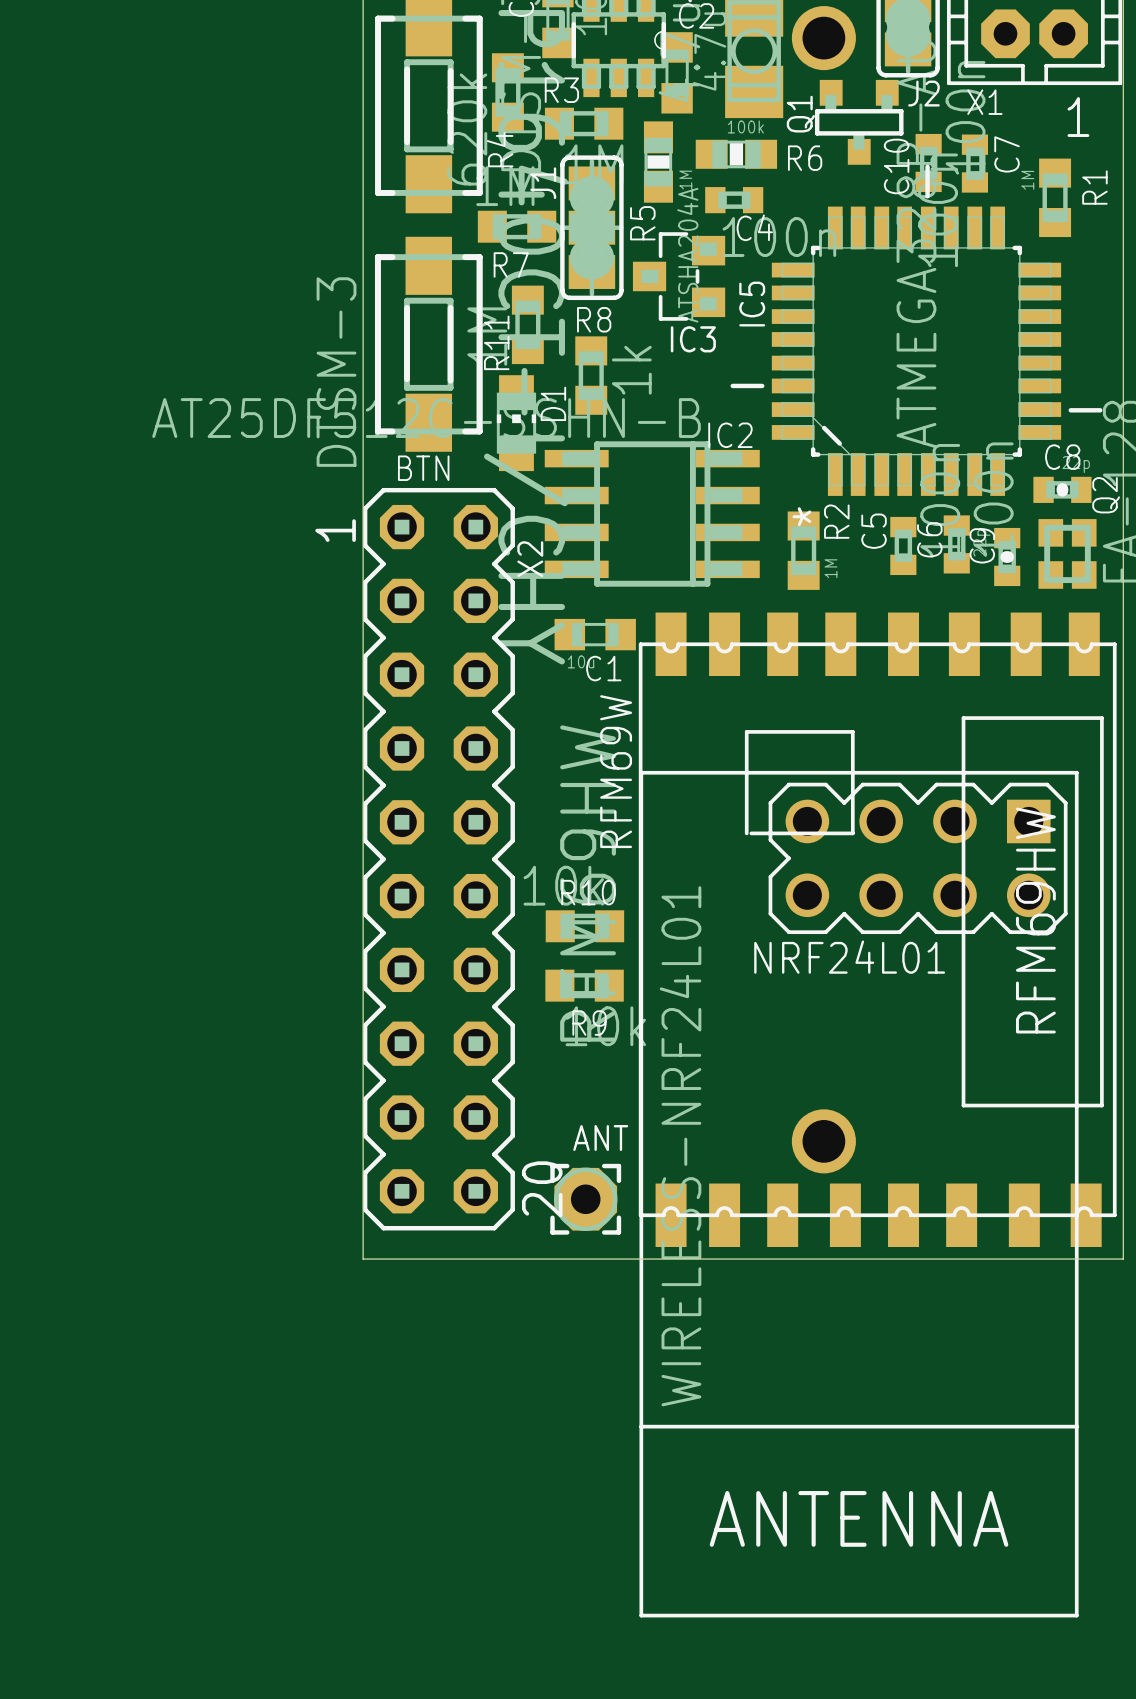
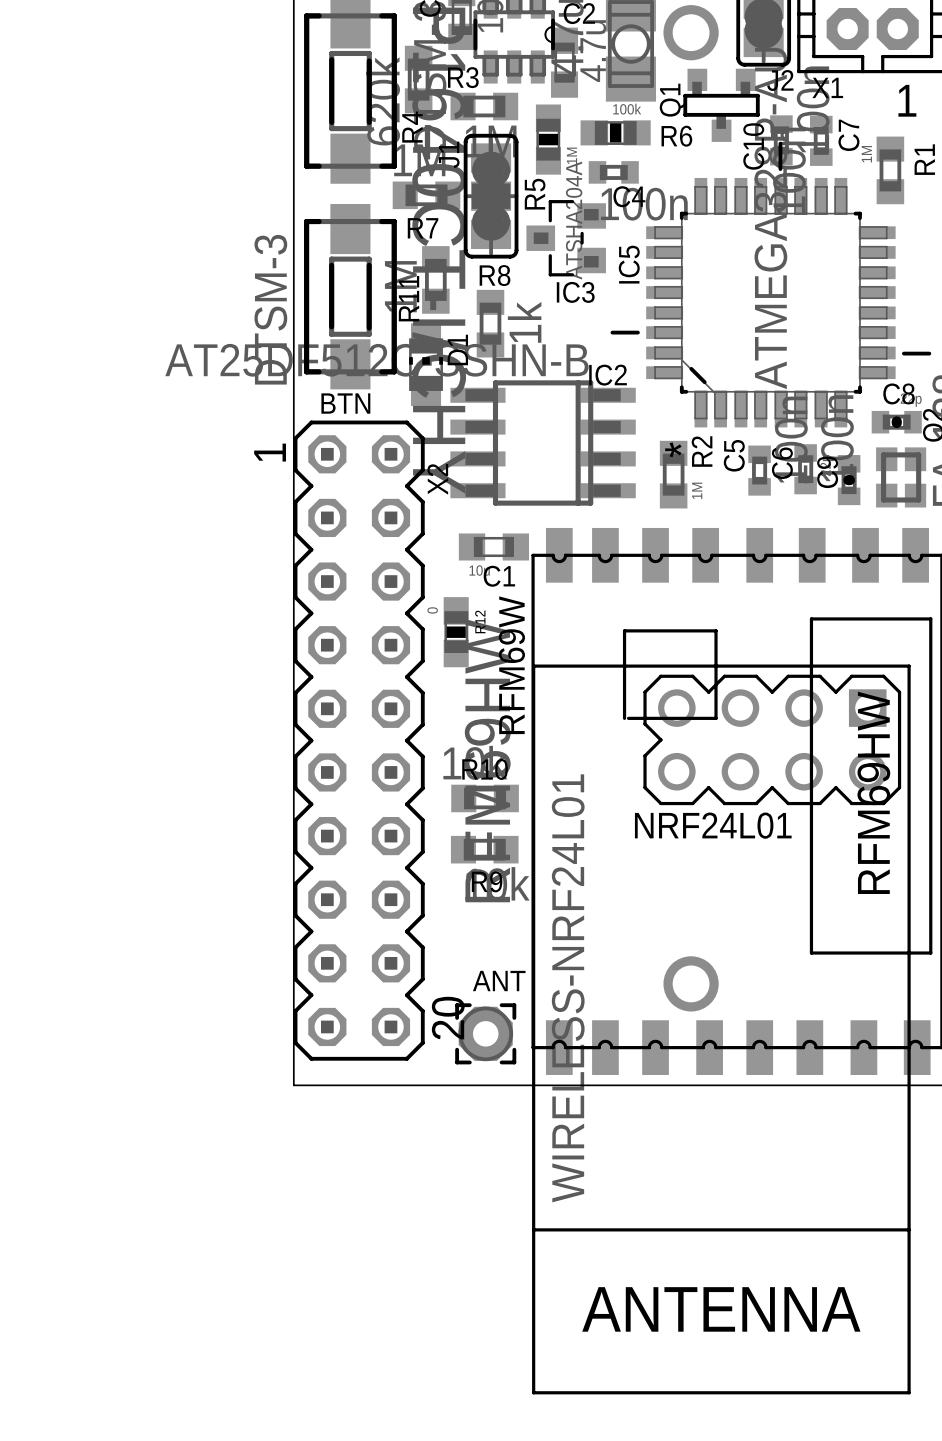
R12: none -> 0 (456, 632)

